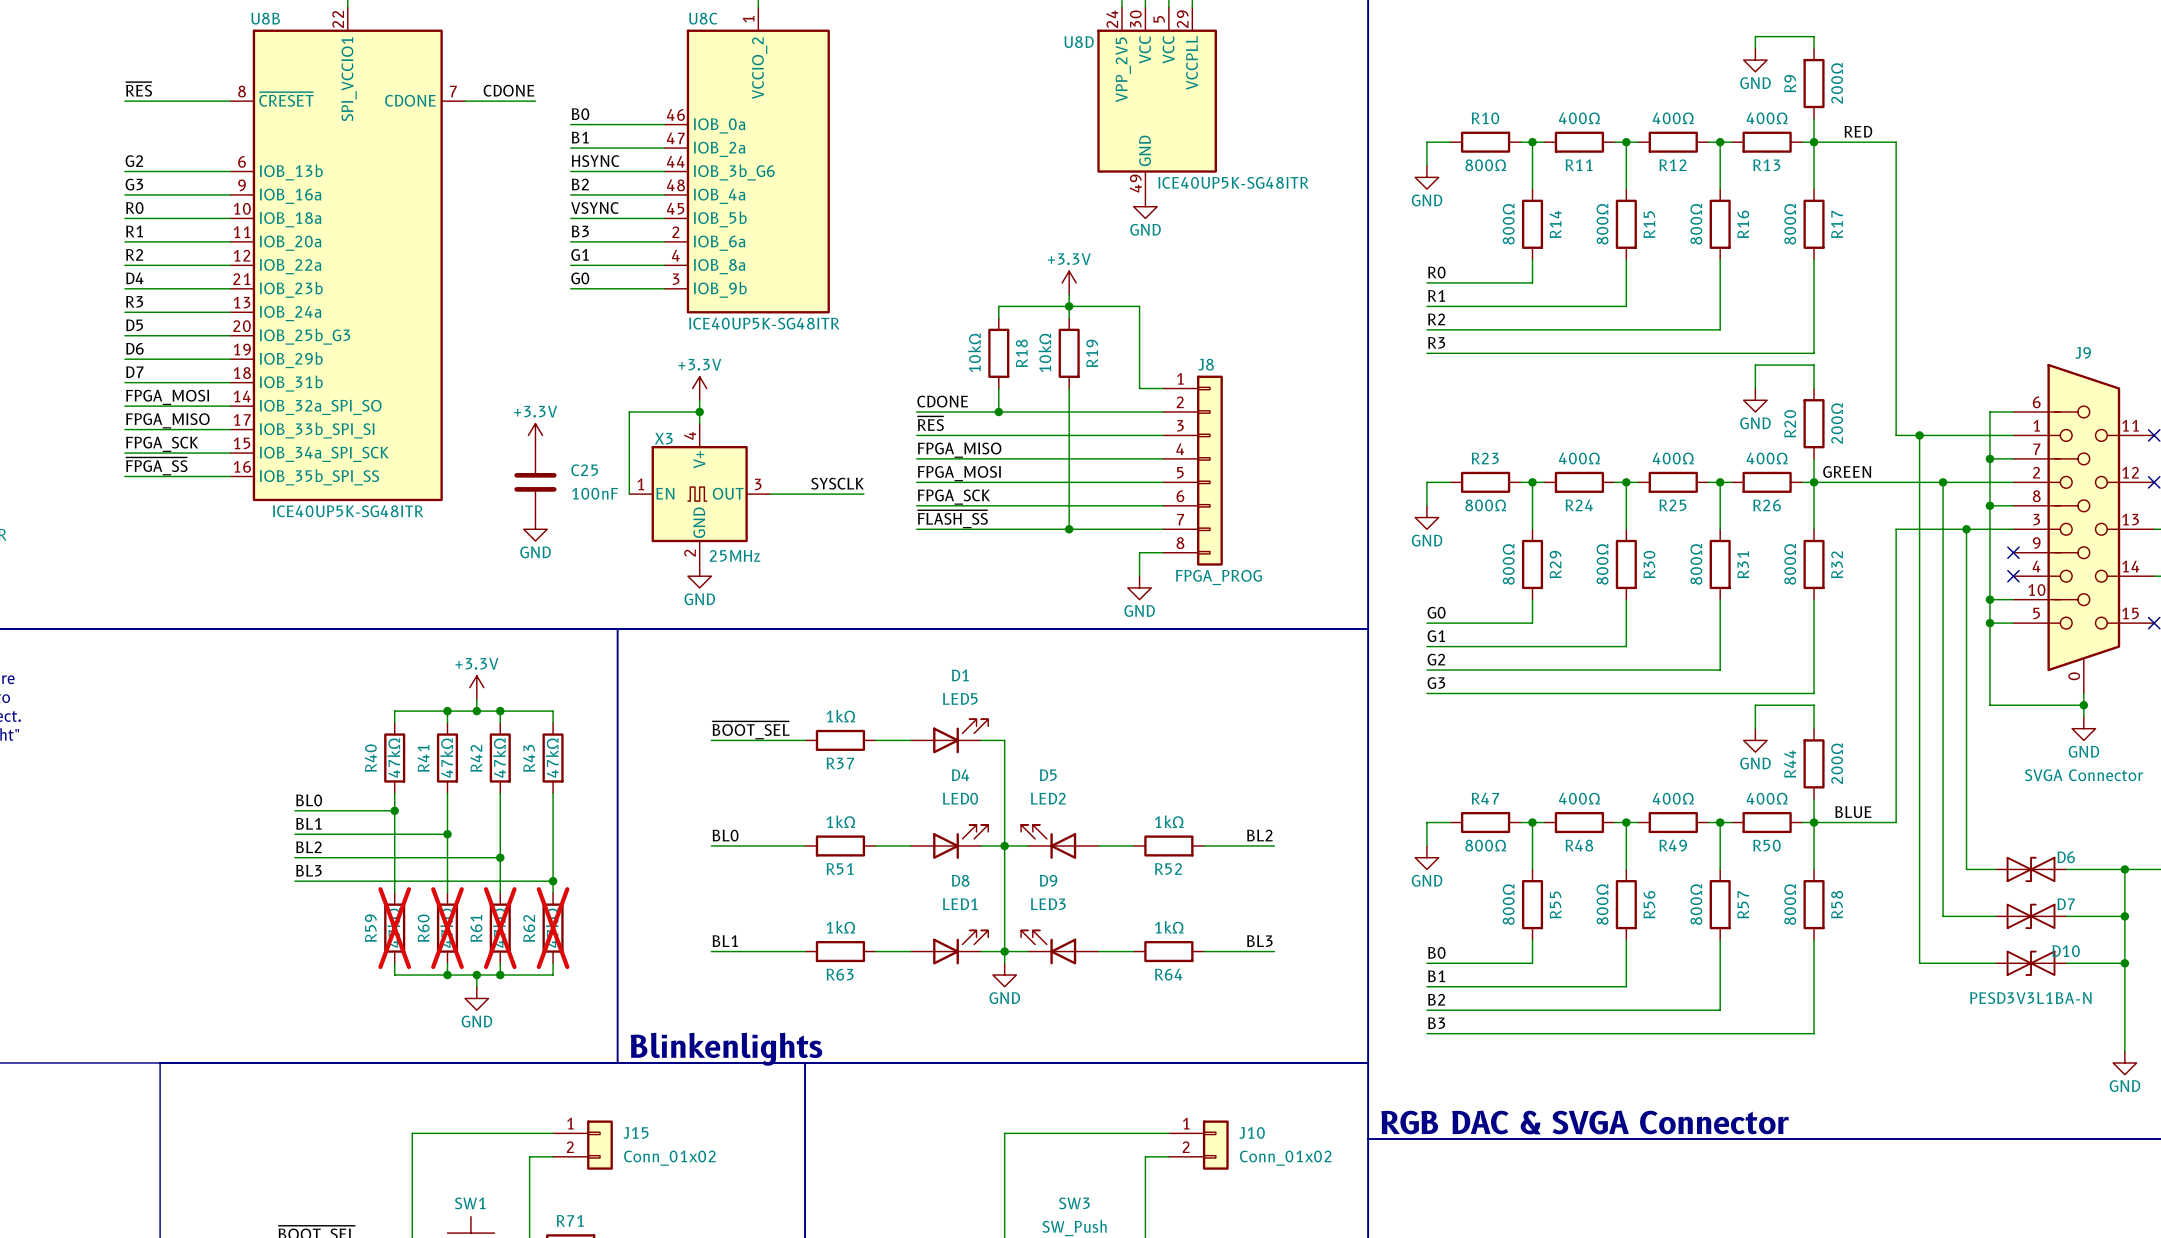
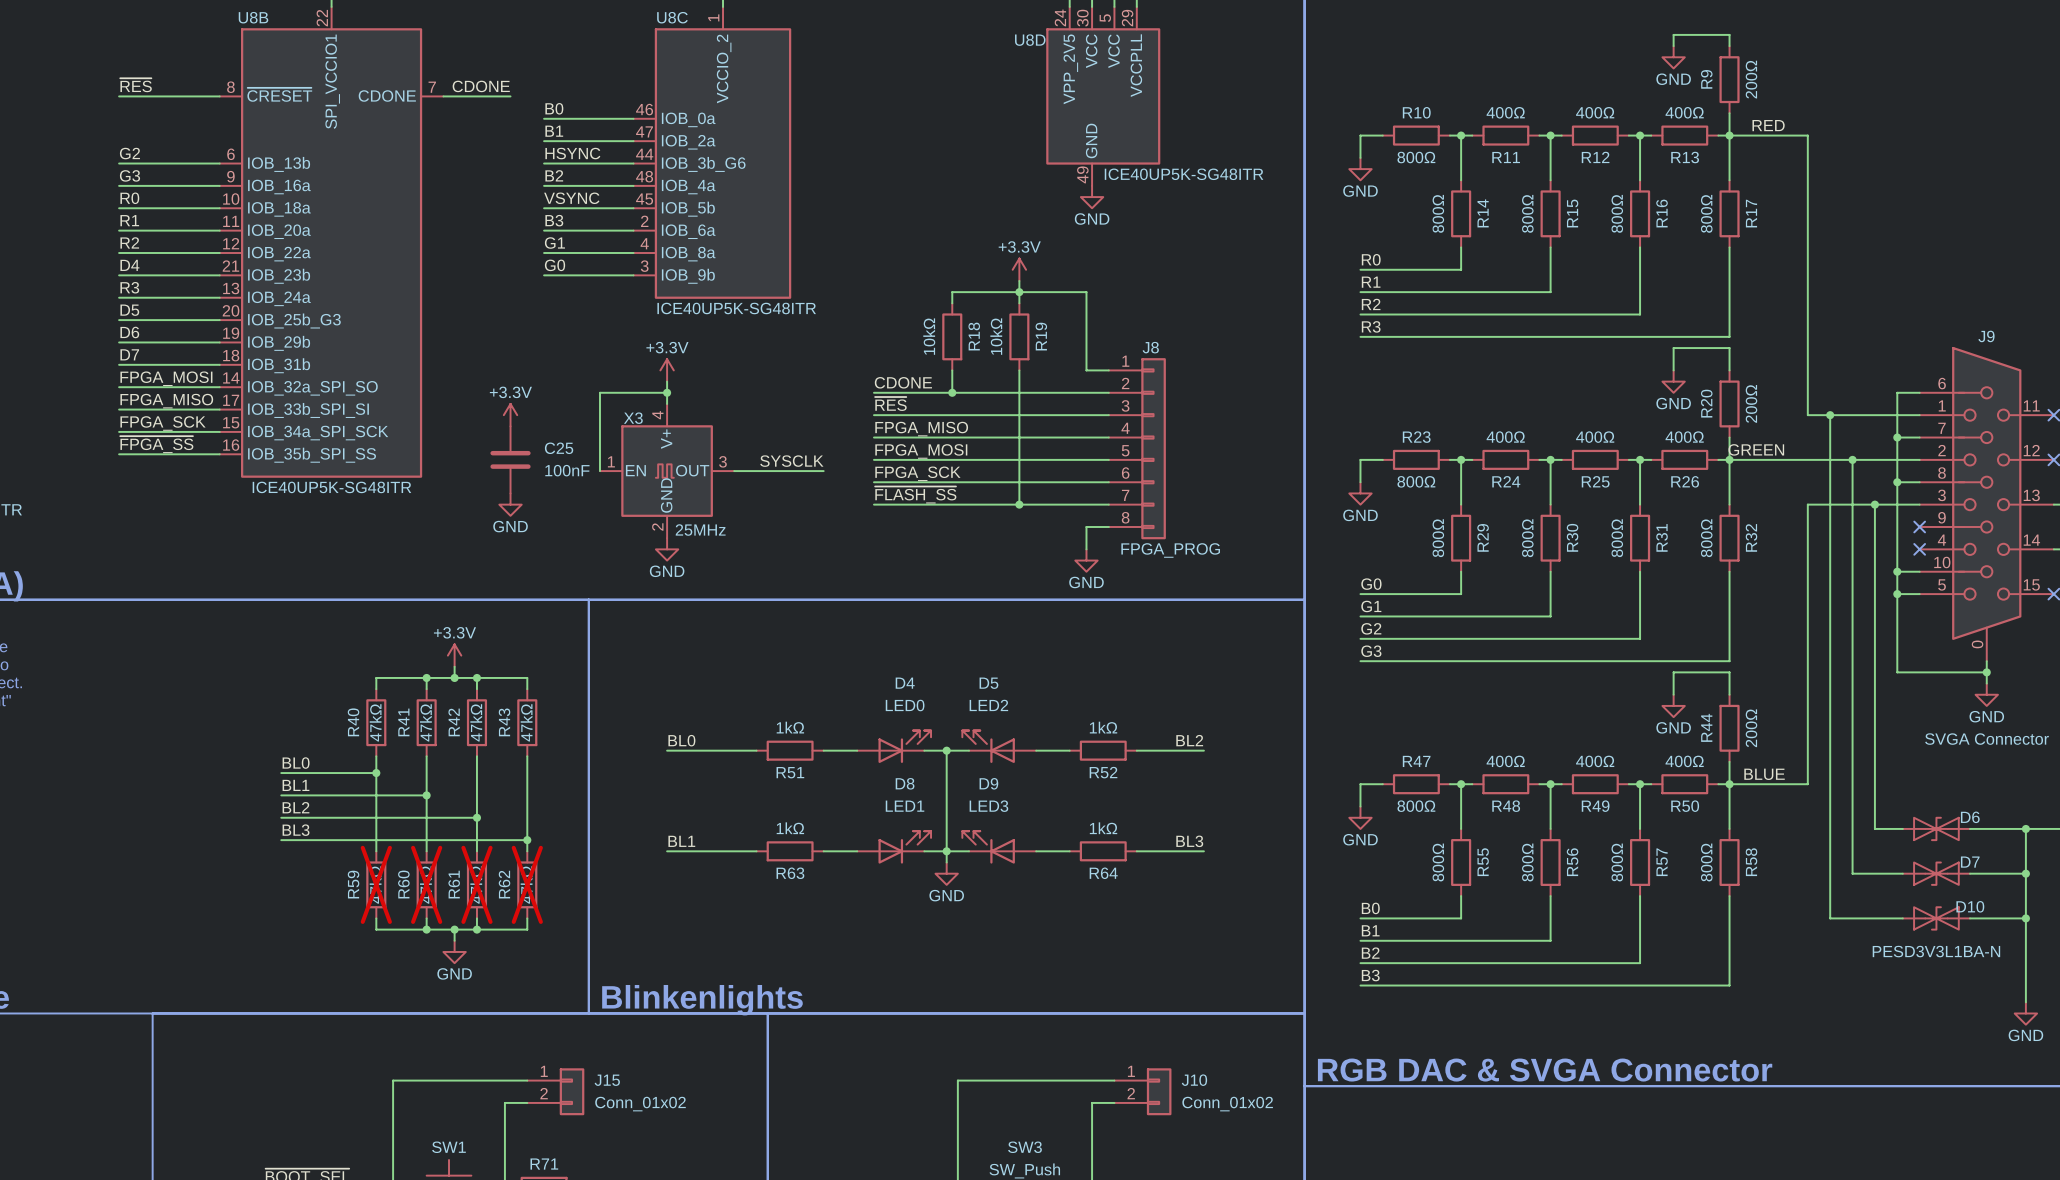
label: ~{BOOT_SEL} (751, 730) -> none
D1: LED5 (949, 736) -> none
wire: (711, 740) (805, 740) -> none
R37: 1kΩ (840, 740) -> none
wire: (875, 740) (910, 740) -> none
wire: (981, 740) (1004, 740) (1004, 963) -> none
wire: none -> (946, 750) (946, 862)
junction: none -> (946, 750)
label position: BL0 (725, 835) -> BL0 (681, 740)
label position: BL2 (1259, 835) -> BL2 (1189, 740)
D4 position: (949, 841) -> (894, 746)
D5 position: (1059, 841) -> (999, 746)
wire: (711, 845) (805, 845) -> (667, 750) (756, 750)
R51 position: (840, 845) -> (790, 750)
wire: (875, 845) (910, 845) -> (823, 750) (857, 750)
wire: (981, 845) (1028, 845) -> (924, 750) (969, 750)
junction: (1004, 845) -> none
wire: (1098, 845) (1133, 845) -> (1036, 750) (1069, 750)
R52 position: (1168, 845) -> (1103, 750)
wire: (1204, 845) (1274, 845) -> (1136, 750) (1203, 750)
junction: none -> (946, 851)
label position: BL1 (725, 941) -> BL1 (681, 841)
label position: BL3 (1259, 941) -> BL3 (1189, 841)
D8 position: (949, 947) -> (894, 847)
D9 position: (1059, 947) -> (999, 847)
wire: (711, 951) (805, 951) -> (667, 851) (756, 851)
R63 position: (840, 951) -> (790, 851)
wire: (875, 951) (910, 951) -> (823, 851) (857, 851)
wire: (981, 951) (1028, 951) -> (924, 851) (969, 851)
junction: (1004, 951) -> none
wire: (1098, 951) (1133, 951) -> (1036, 851) (1069, 851)
R64 position: (1168, 951) -> (1103, 851)
wire: (1204, 951) (1274, 951) -> (1136, 851) (1203, 851)
power symbol position: GND (1004, 975) -> GND (946, 873)

